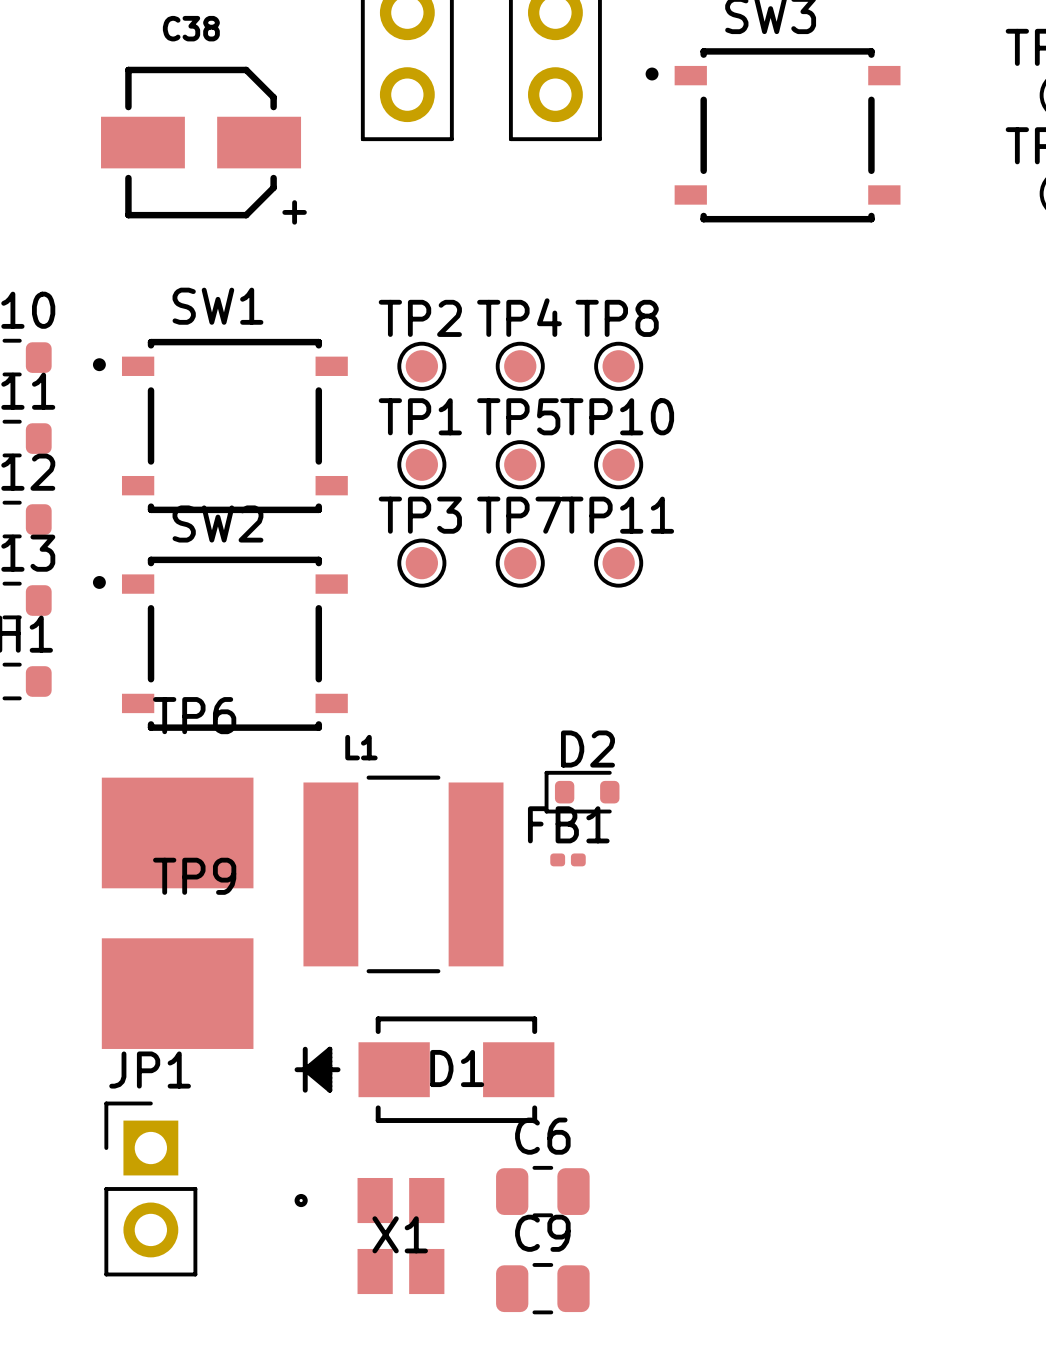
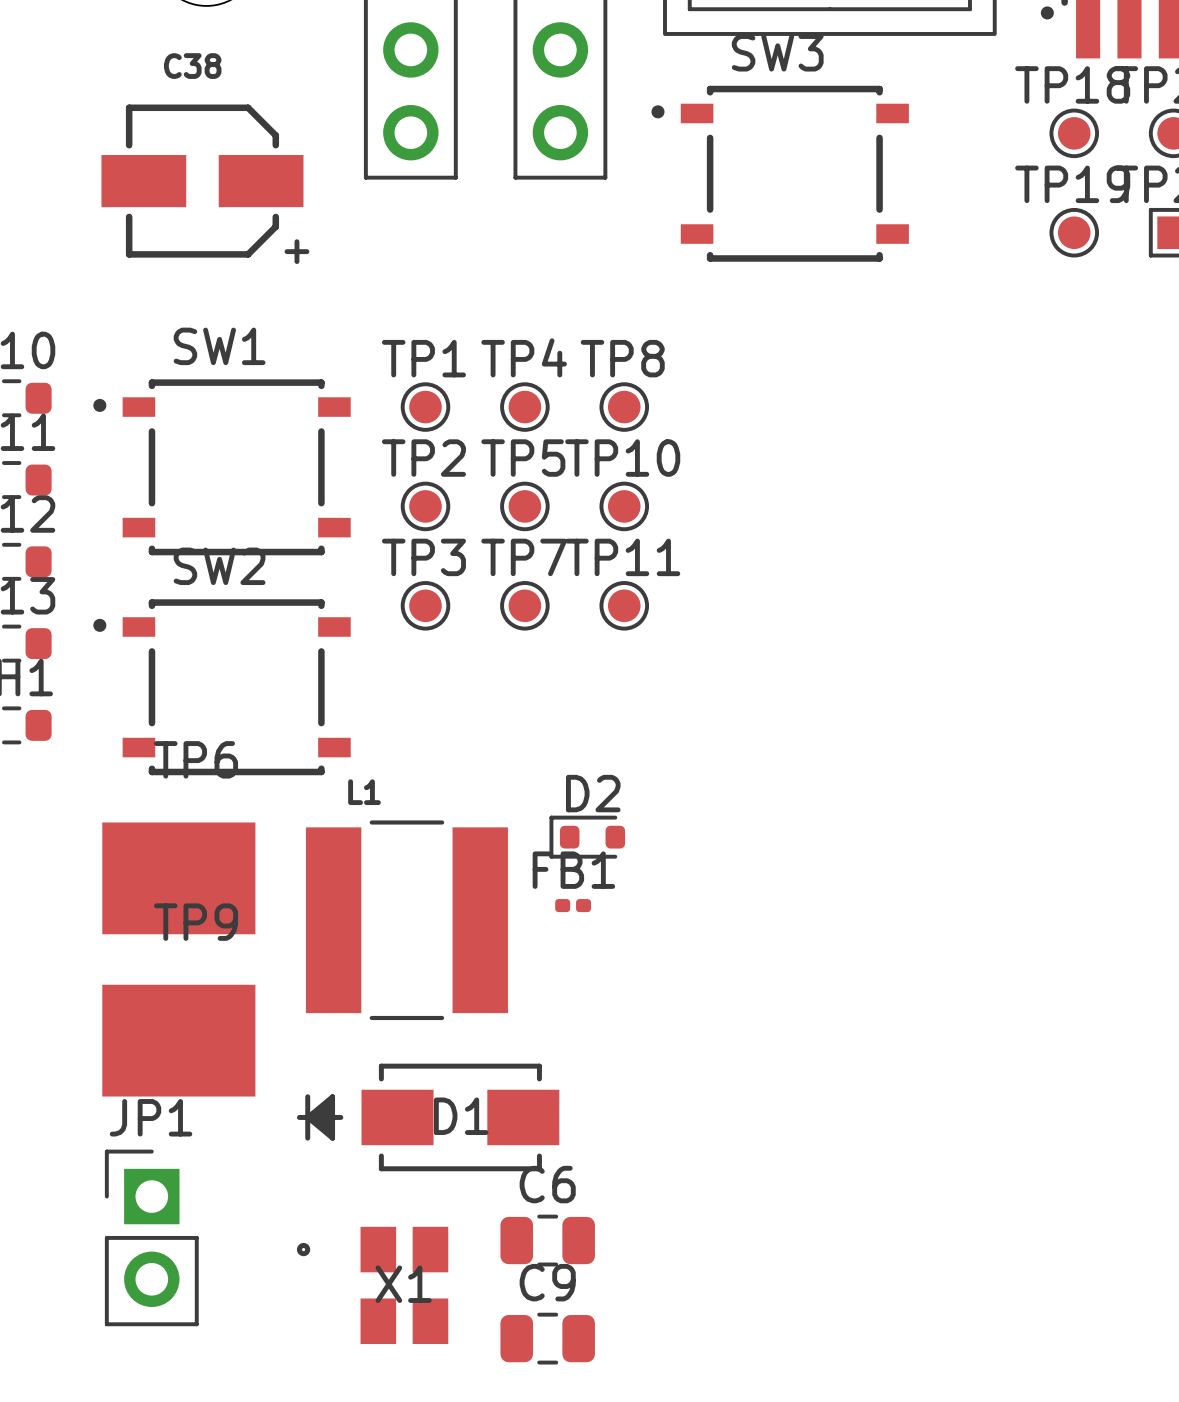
TP2 name: TP2 (420, 318) -> TP1 (423, 358)
TP1 name: TP1 (420, 416) -> TP2 (423, 458)

